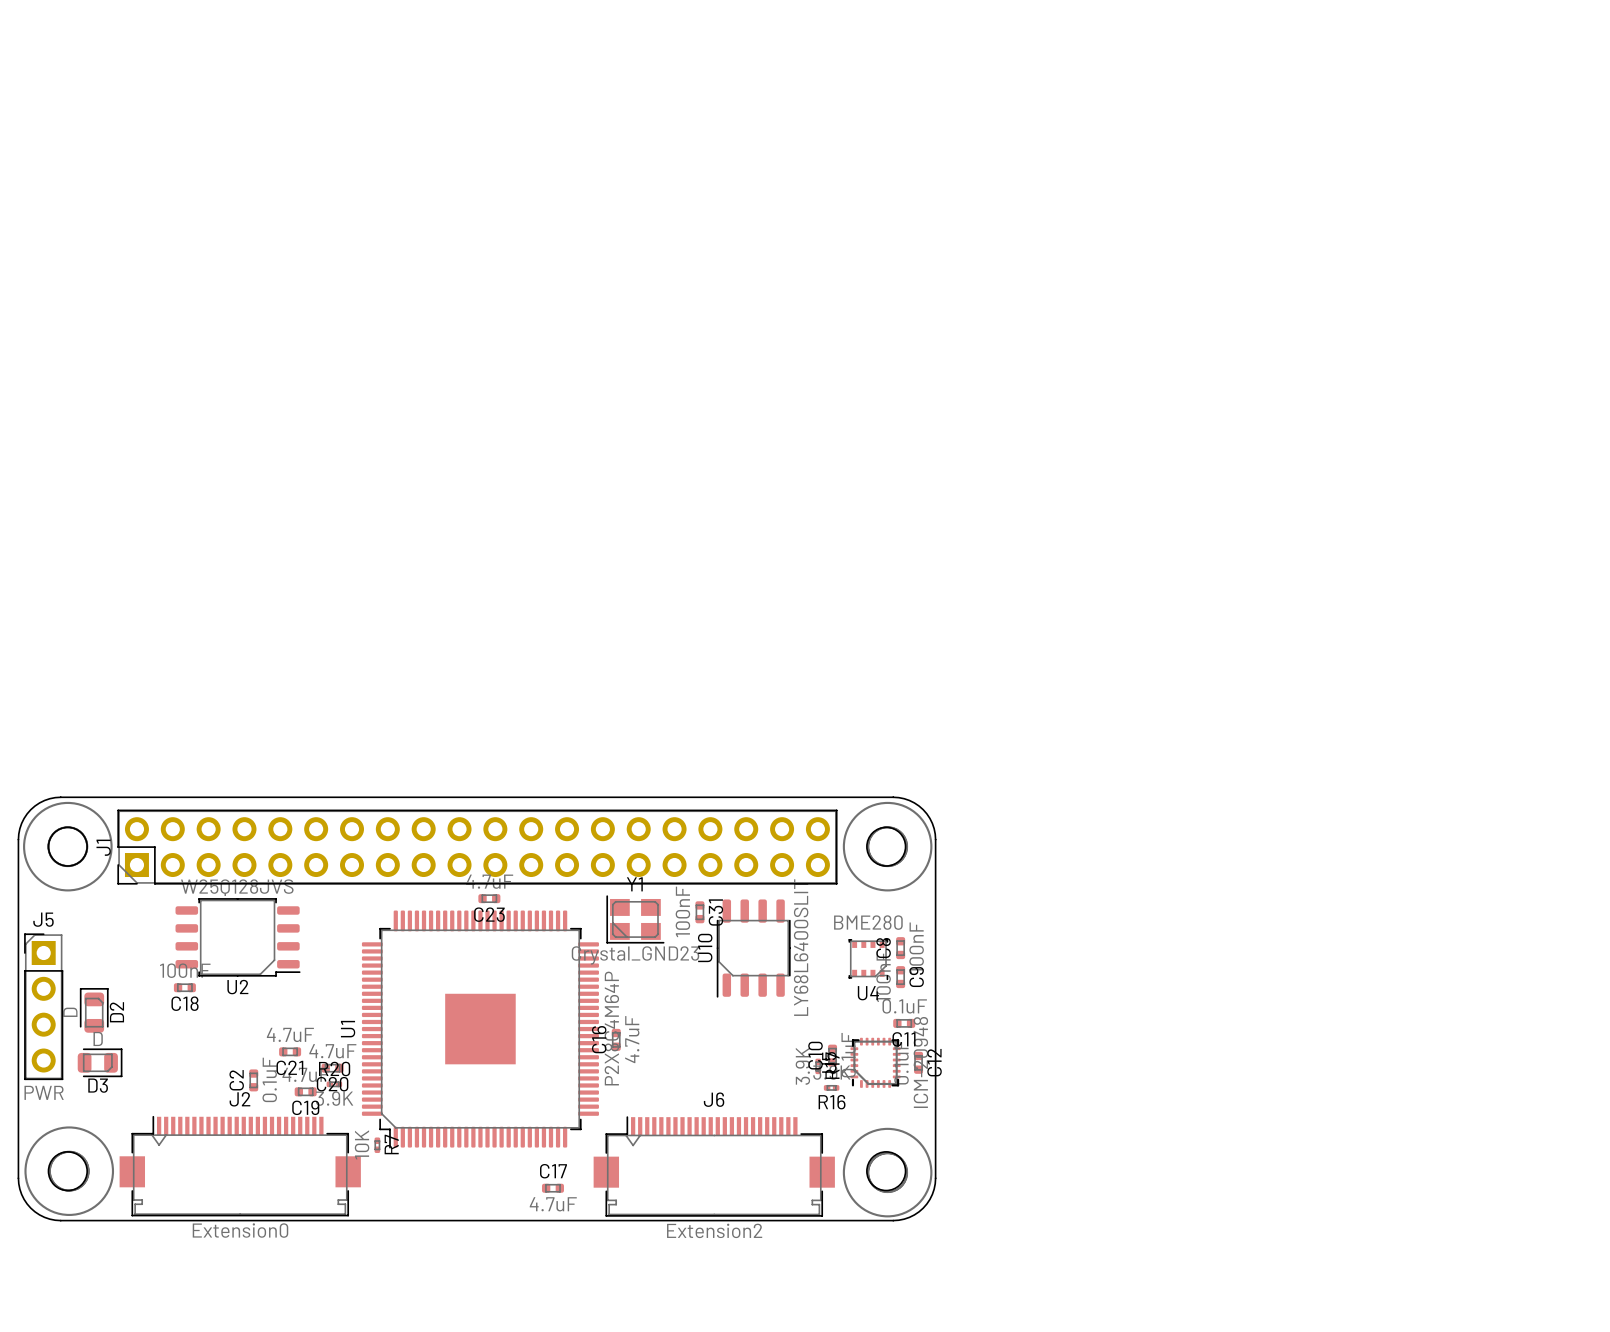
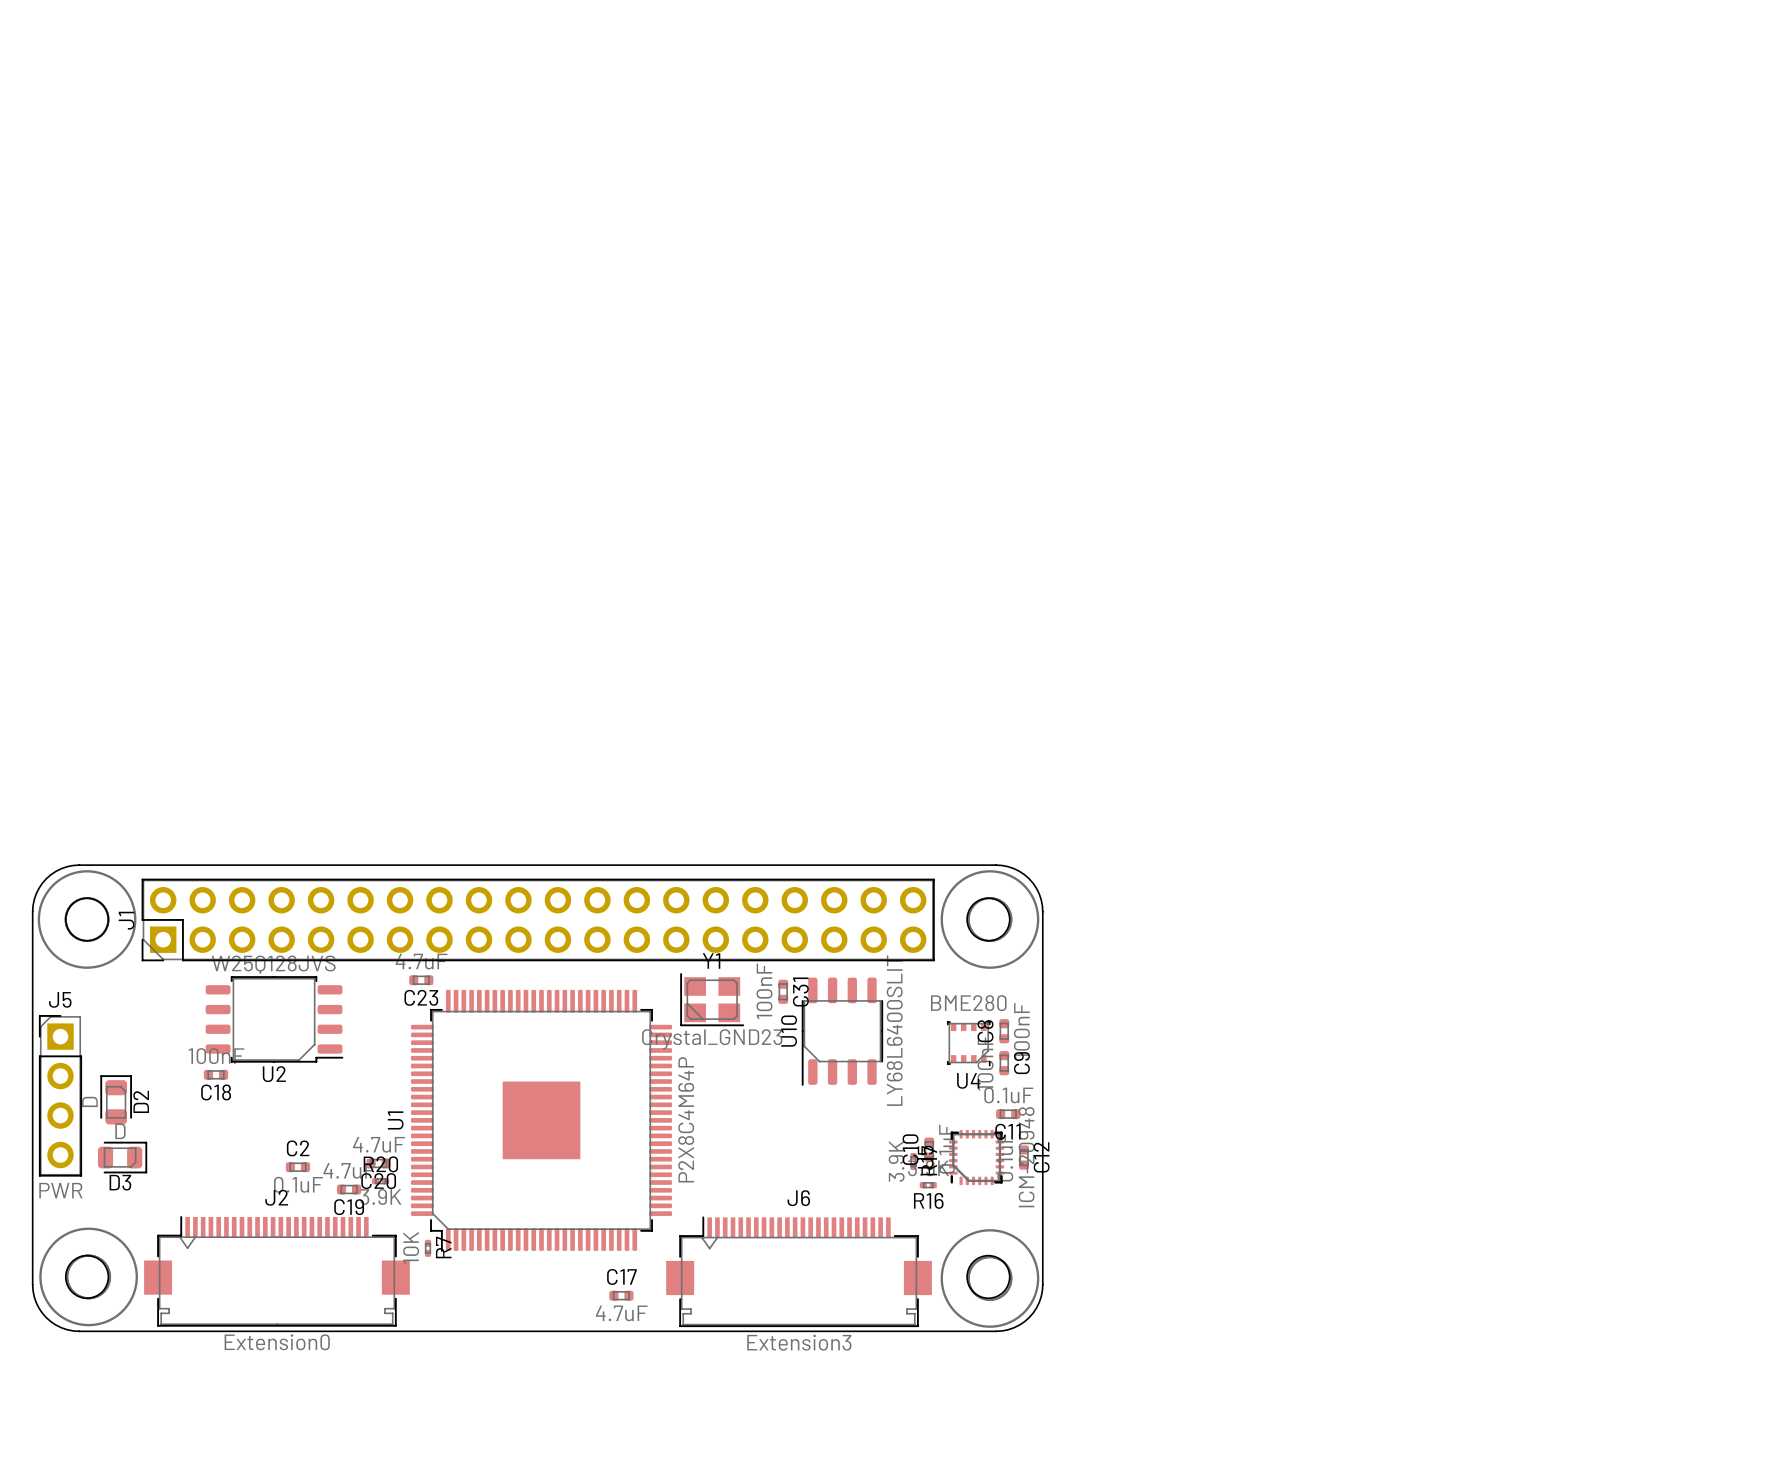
C23 position: (489, 898) -> (421, 980)
C16: 4.7uF (616, 1039) -> none
C21: 4.7uF (290, 1051) -> none
C2 rotation: 0° (253, 1080) -> 90° clockwise (297, 1167)
J6 value: Extension2 (714, 1230) -> Extension3 (799, 1342)

